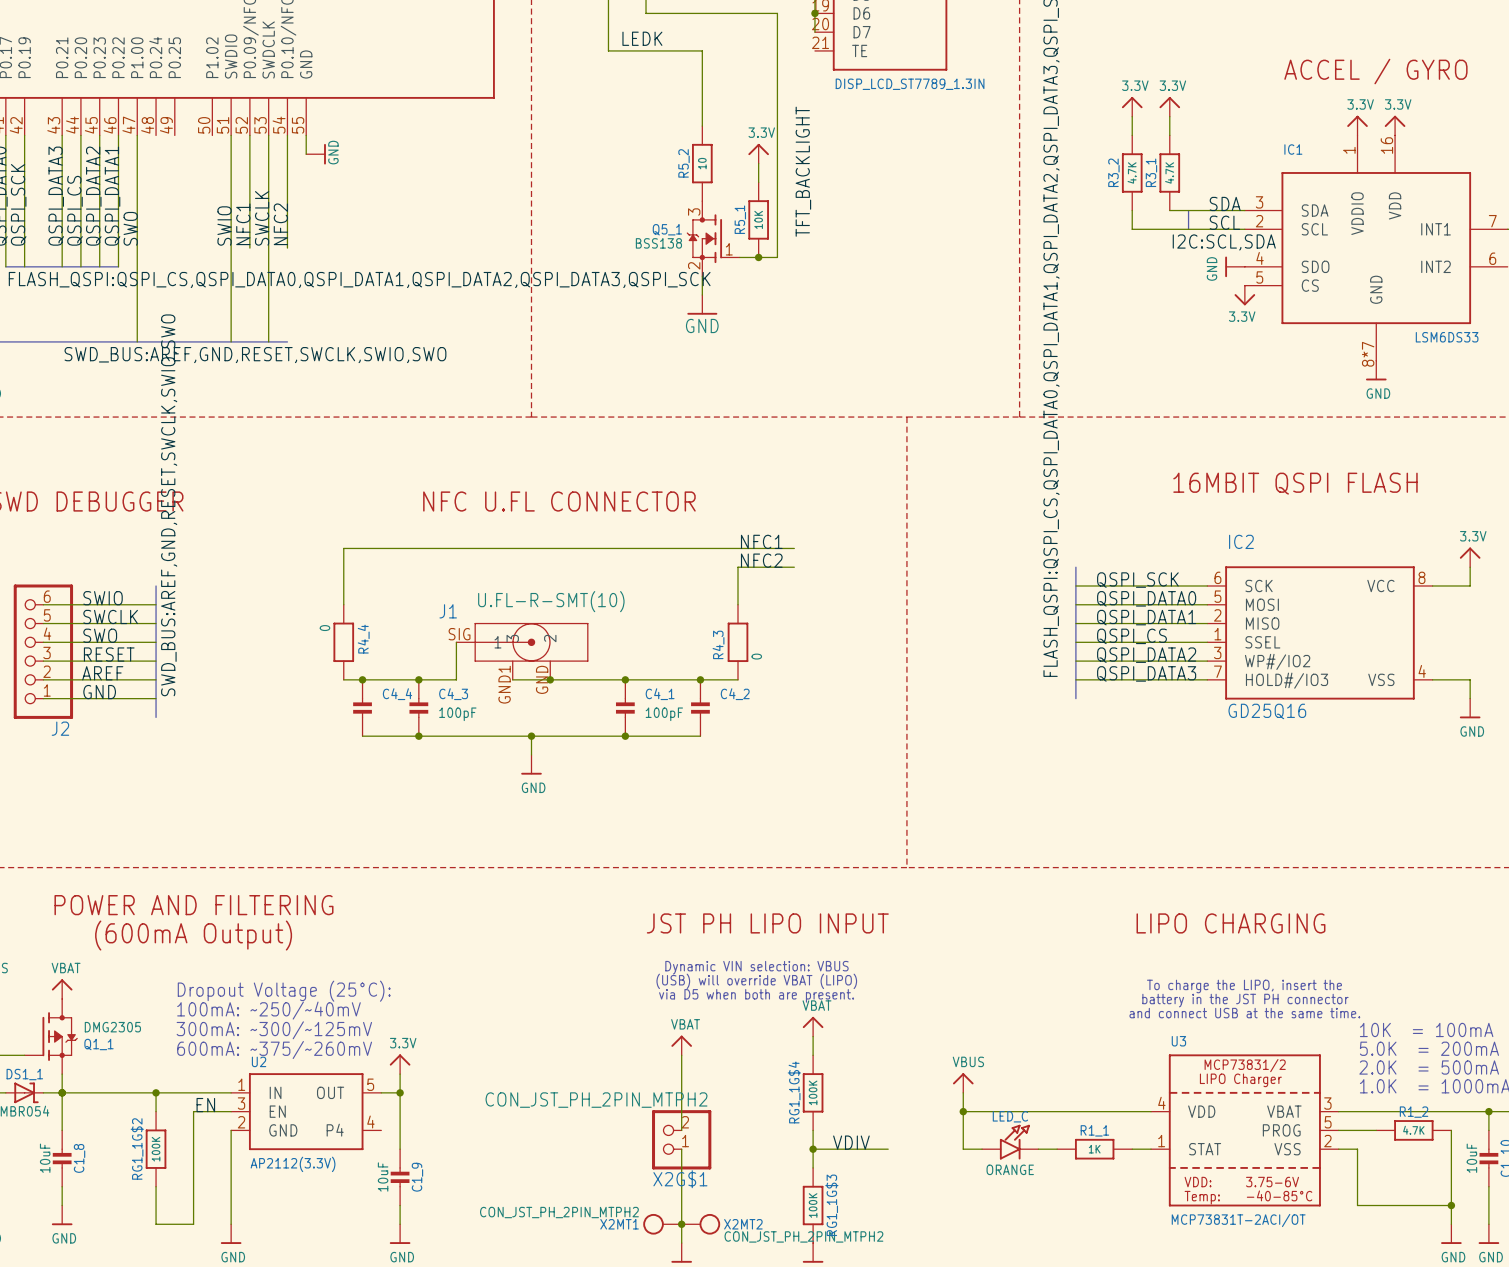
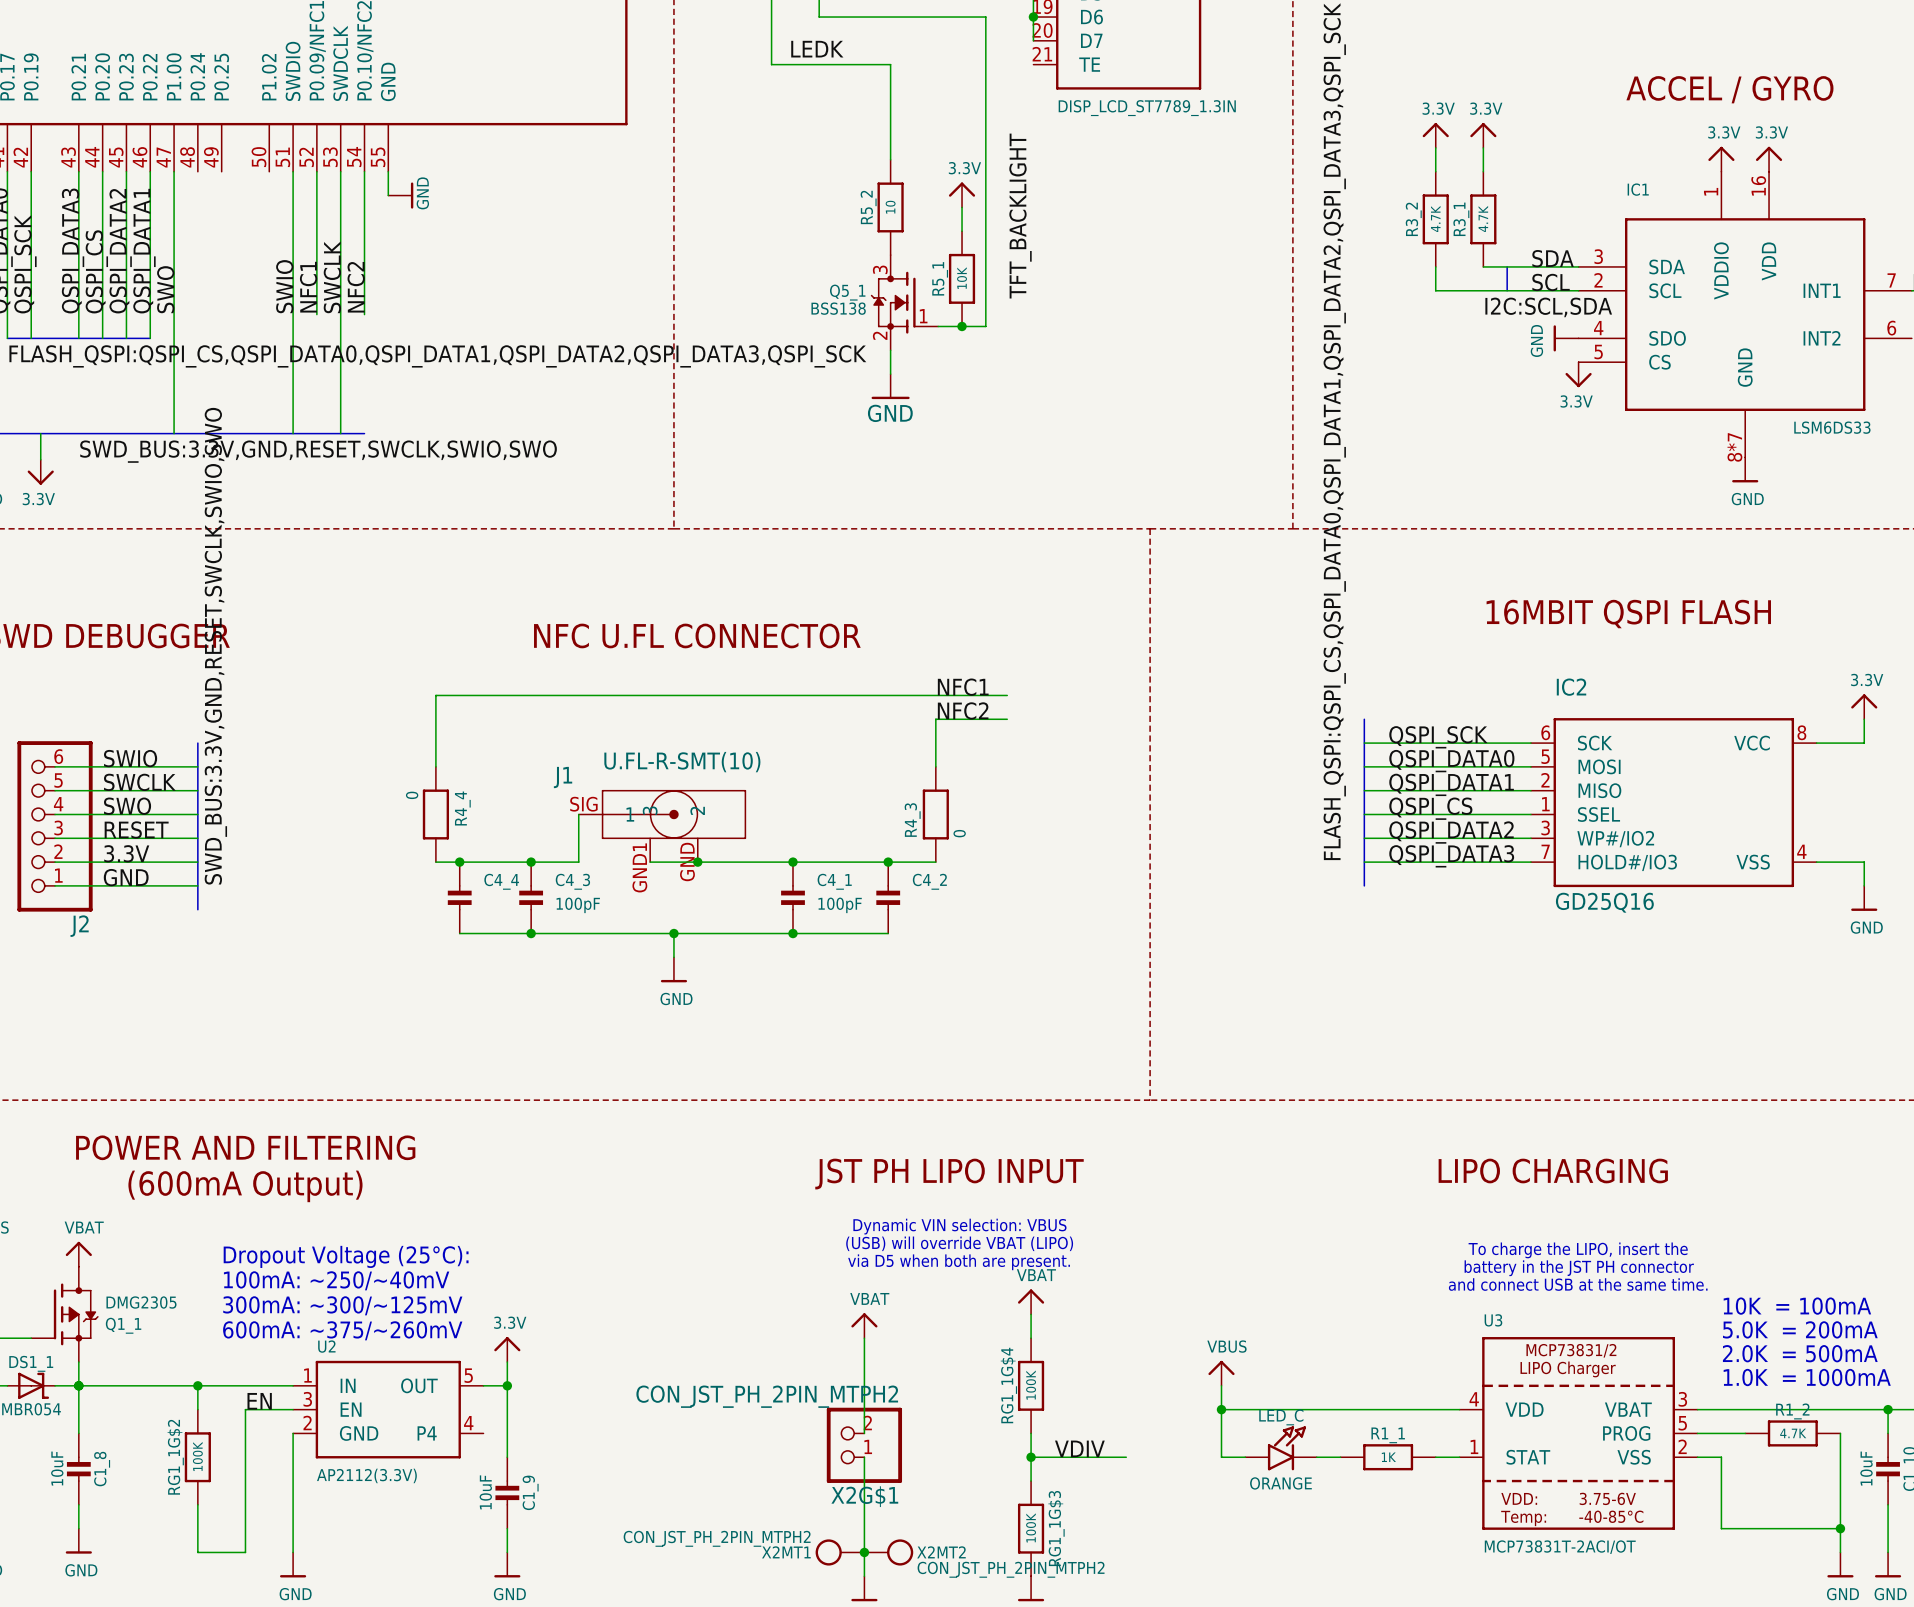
wire: none -> (40, 433) (40, 459)
label: SWD_BUS:AREF,GND,RESET,SWCLK,SWIO,SWO (255, 355) -> SWD_BUS:3.3V,GND,RESET,SWCLK,SWIO,SWO (318, 451)
power symbol: none -> 3.3V (40, 472)
label: SWD_BUS:AREF,GND,RESET,SWCLK,SWIO,SWO (169, 505) -> SWD_BUS:3.3V,GND,RESET,SWCLK,SWIO,SWO (215, 646)
label: AREF (102, 673) -> 3.3V (126, 853)

